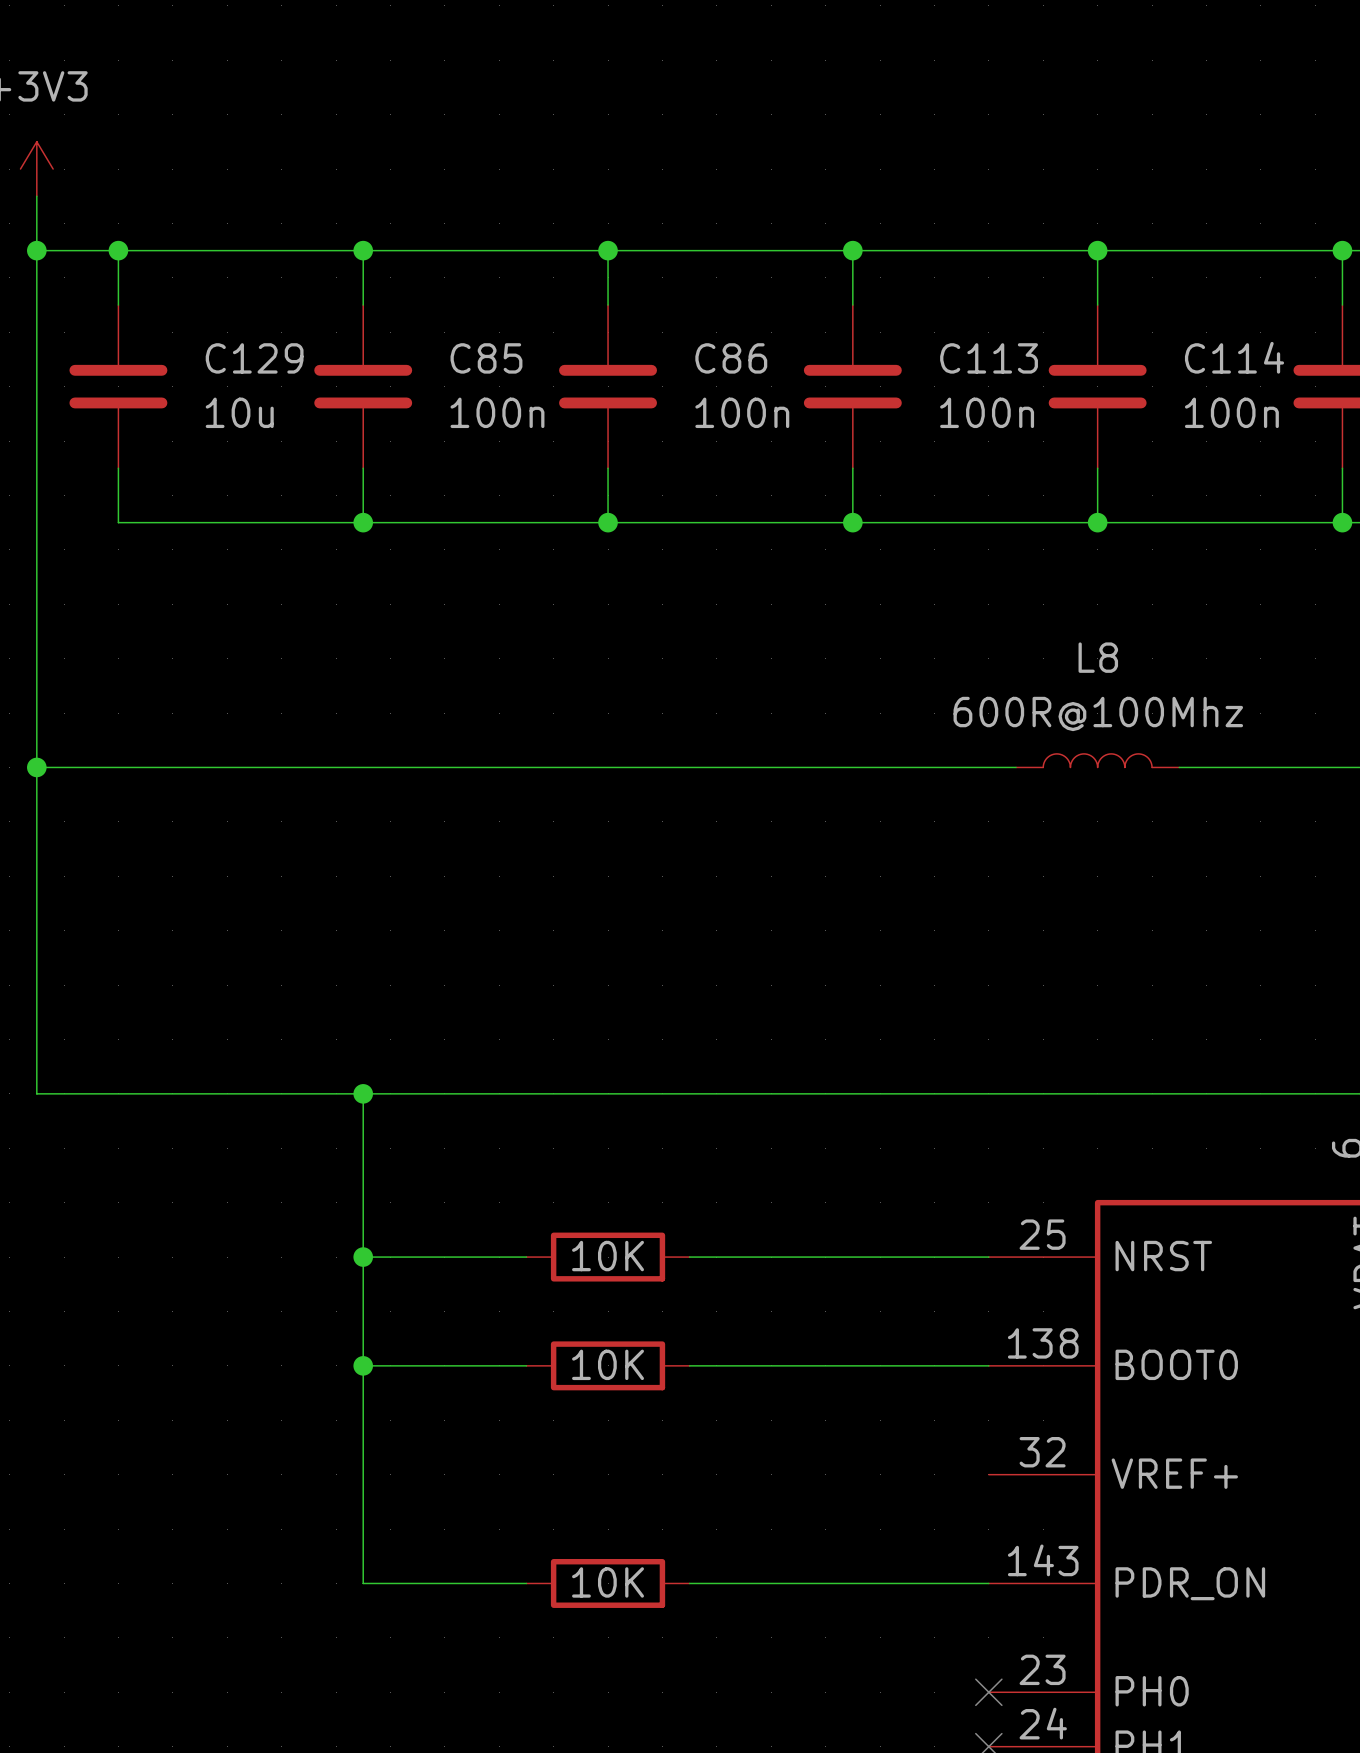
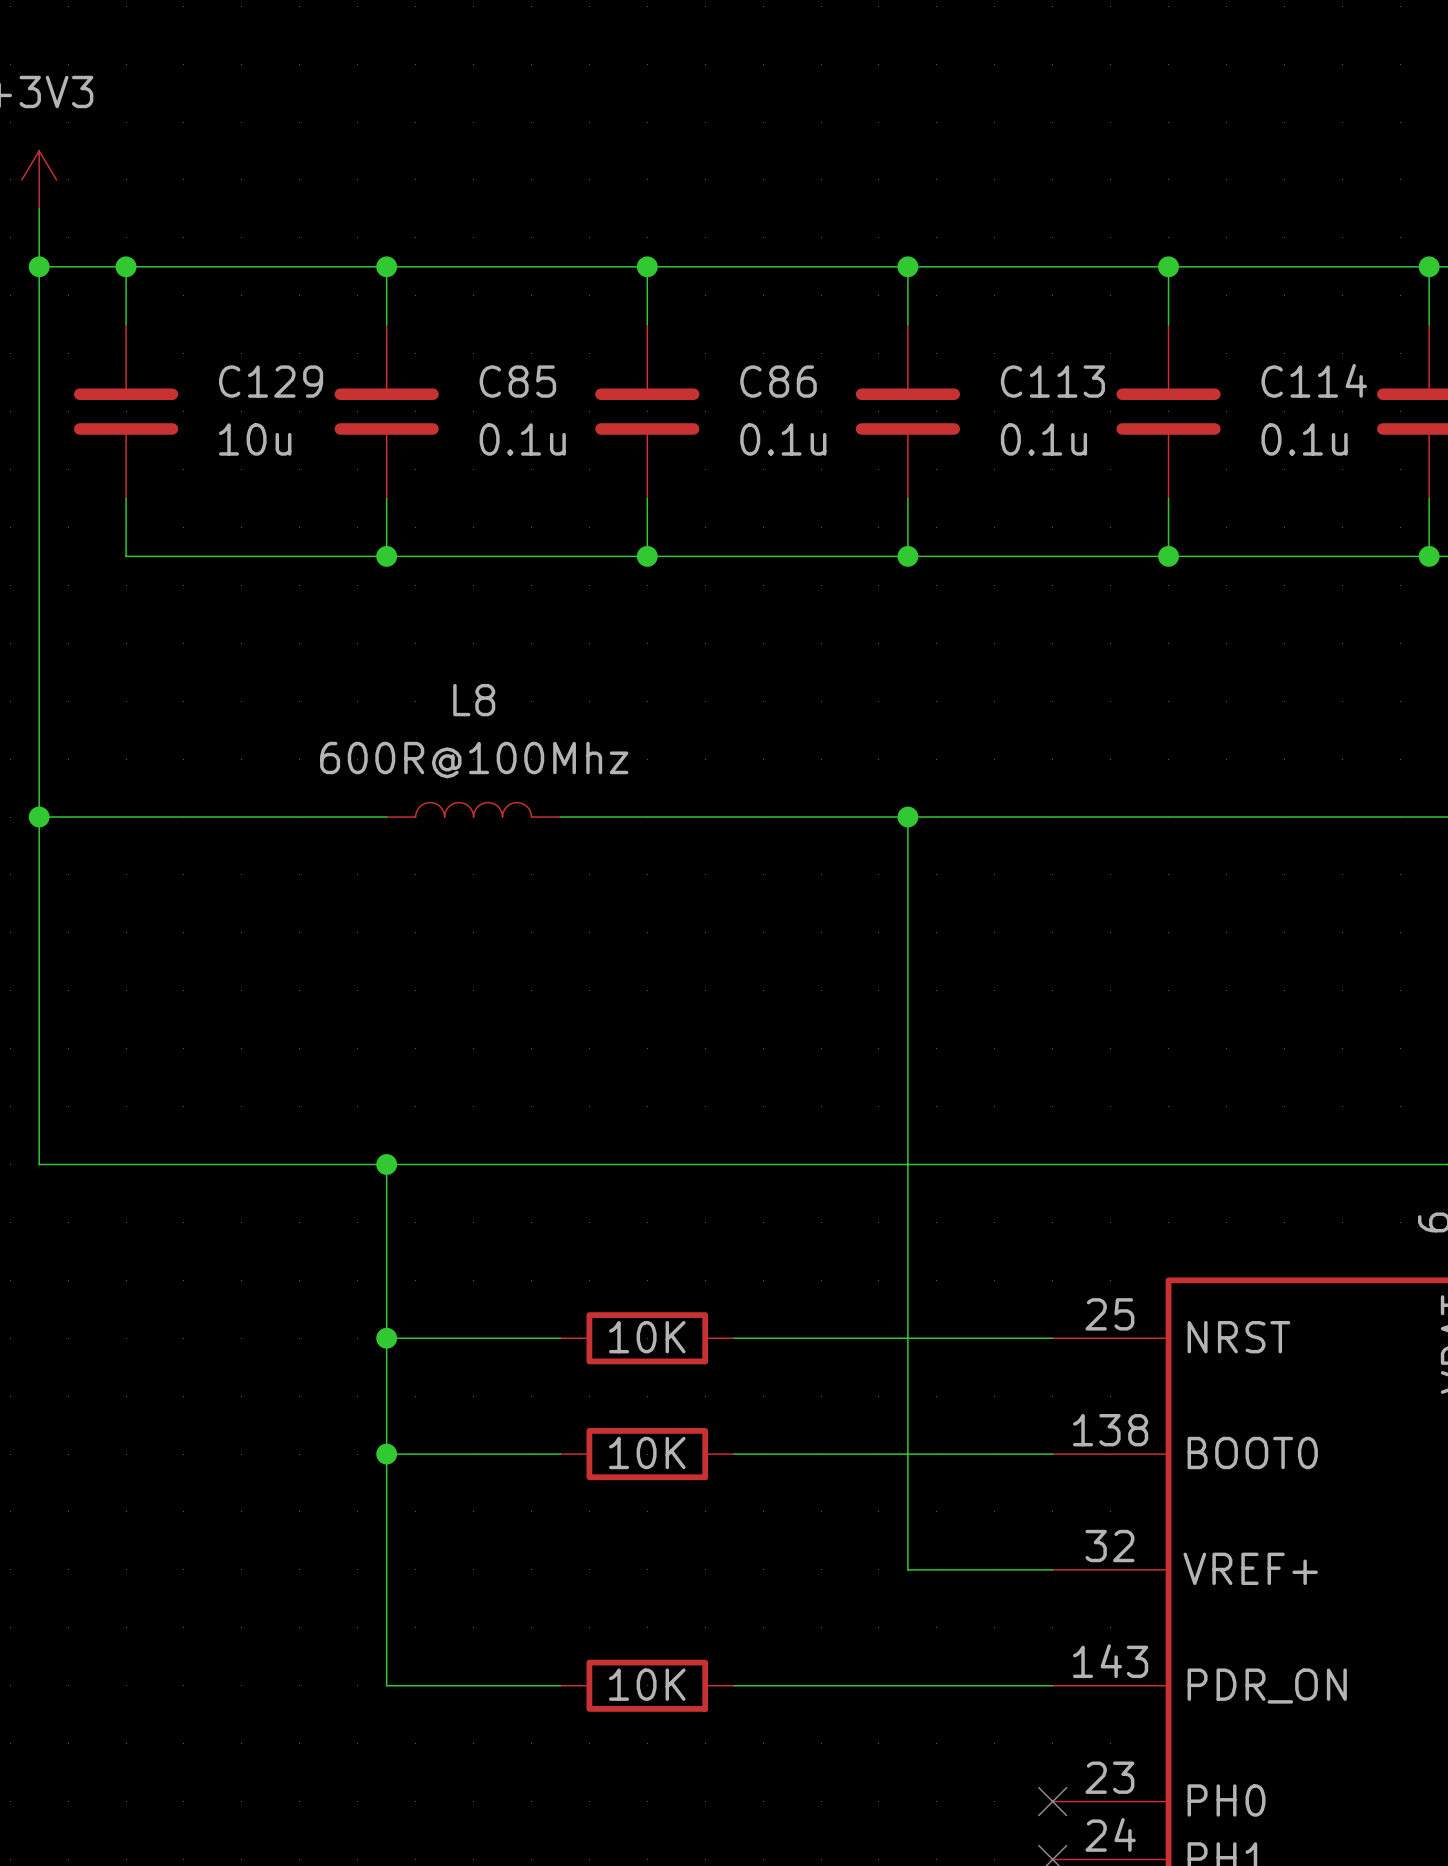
C85 value: 100n (497, 412) -> 0.1u (522, 439)
C86 value: 100n (742, 412) -> 0.1u (783, 439)
C113 value: 100n (987, 412) -> 0.1u (1043, 439)
C114 value: 100n (1231, 412) -> 0.1u (1304, 439)
L8 position: (1097, 760) -> (473, 809)
wire: (363, 767) (526, 767) -> none
wire: none -> (907, 817) (907, 1569) (1052, 1569)
junction: none -> (907, 817)
wire: none -> (1081, 817) (1255, 817)

